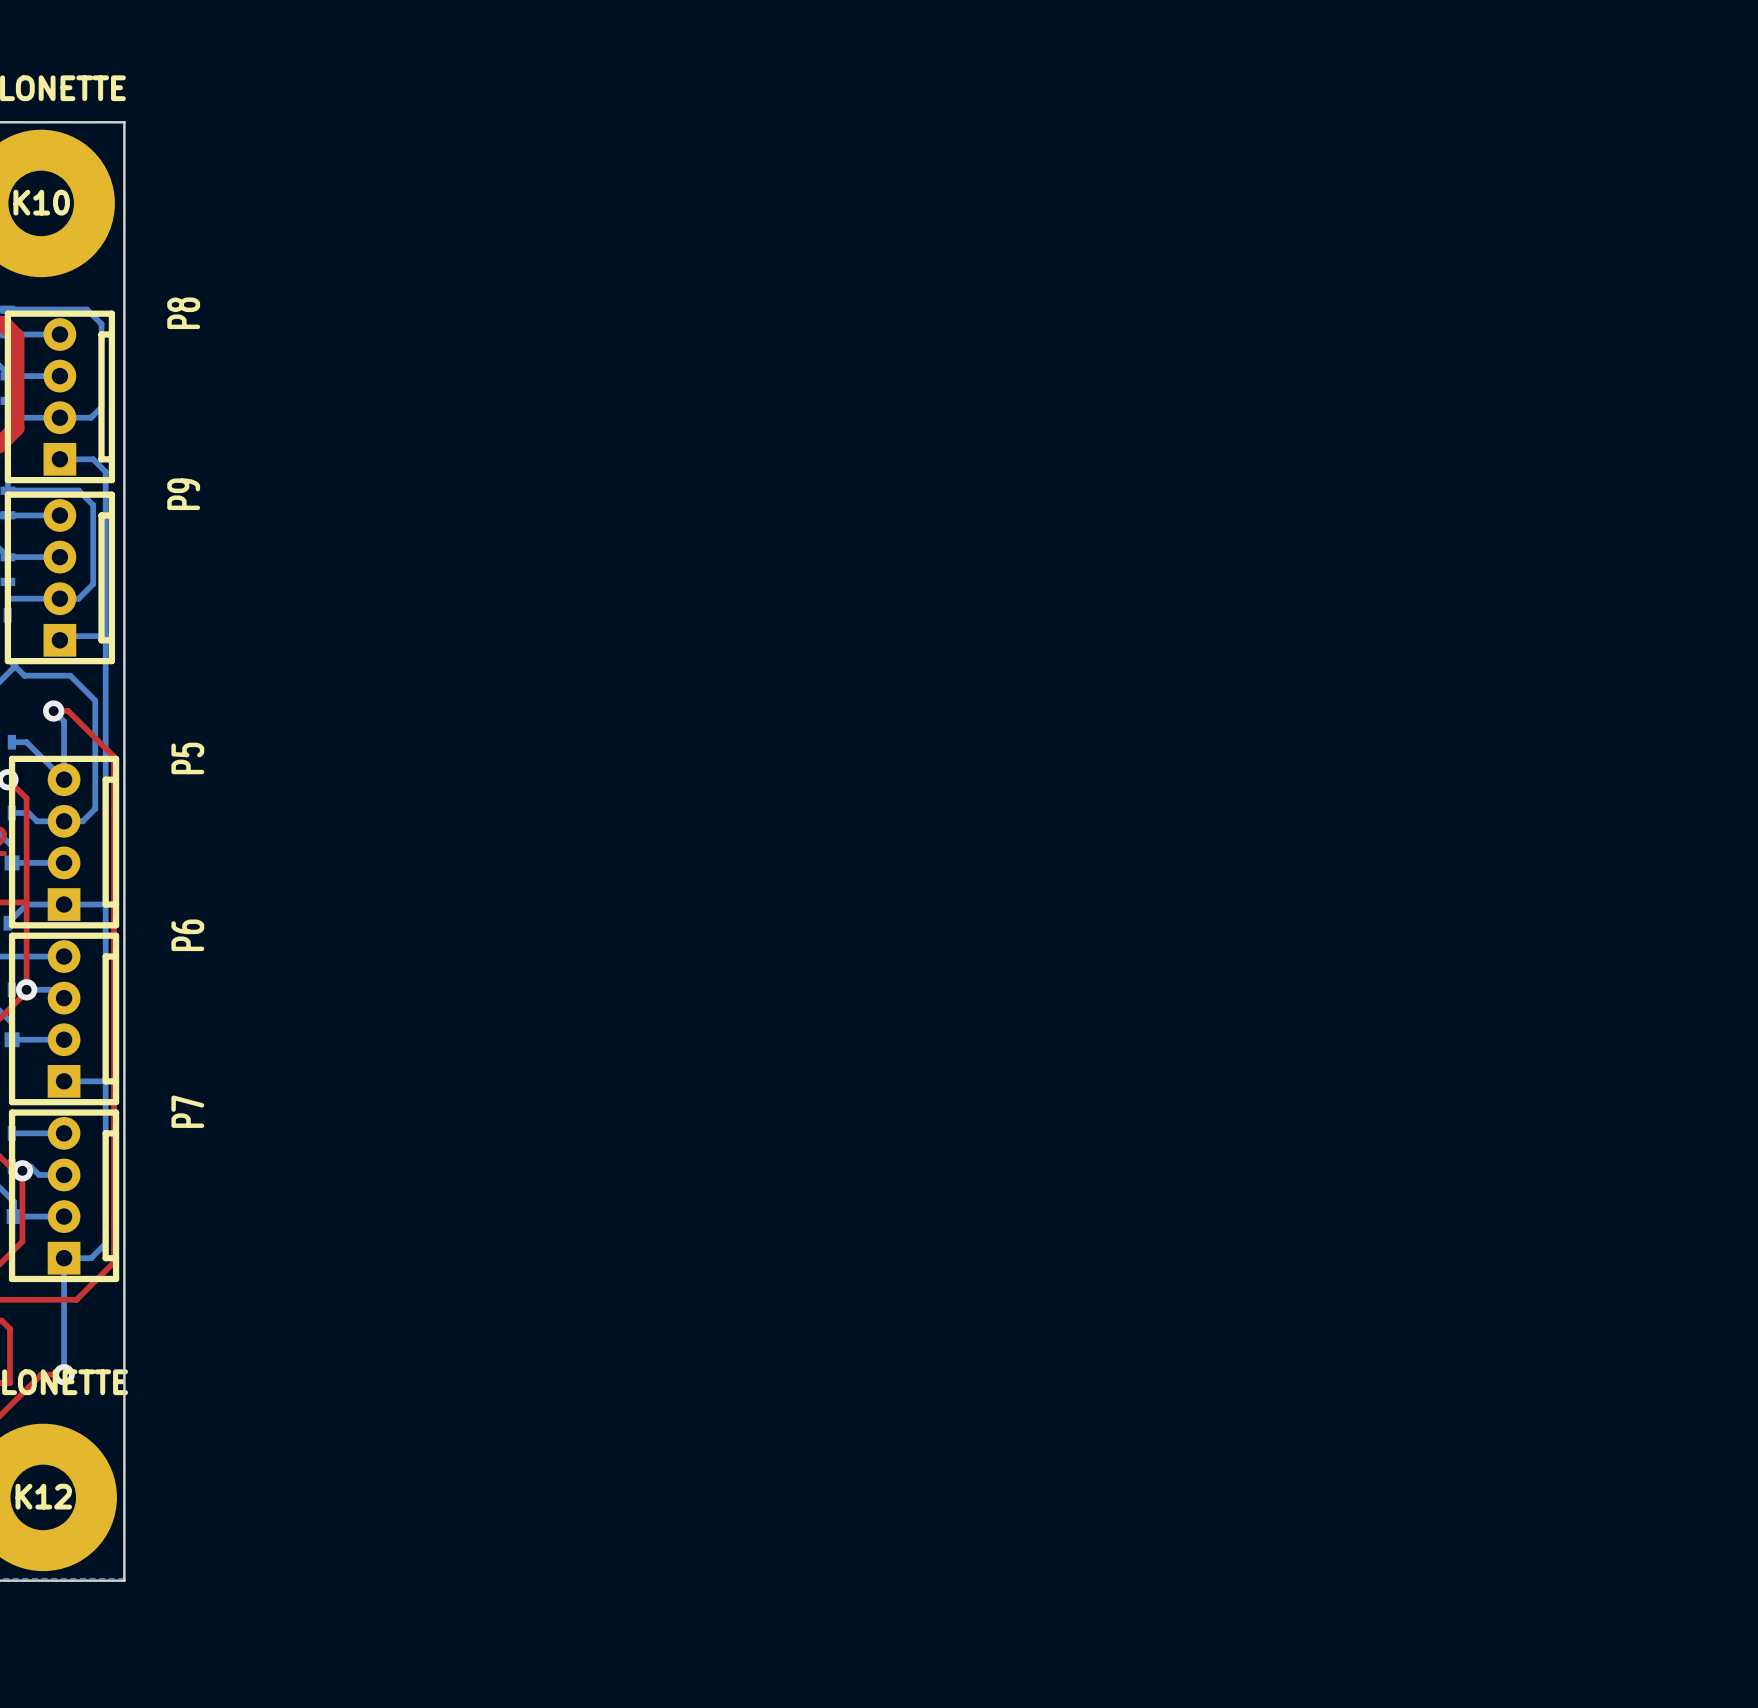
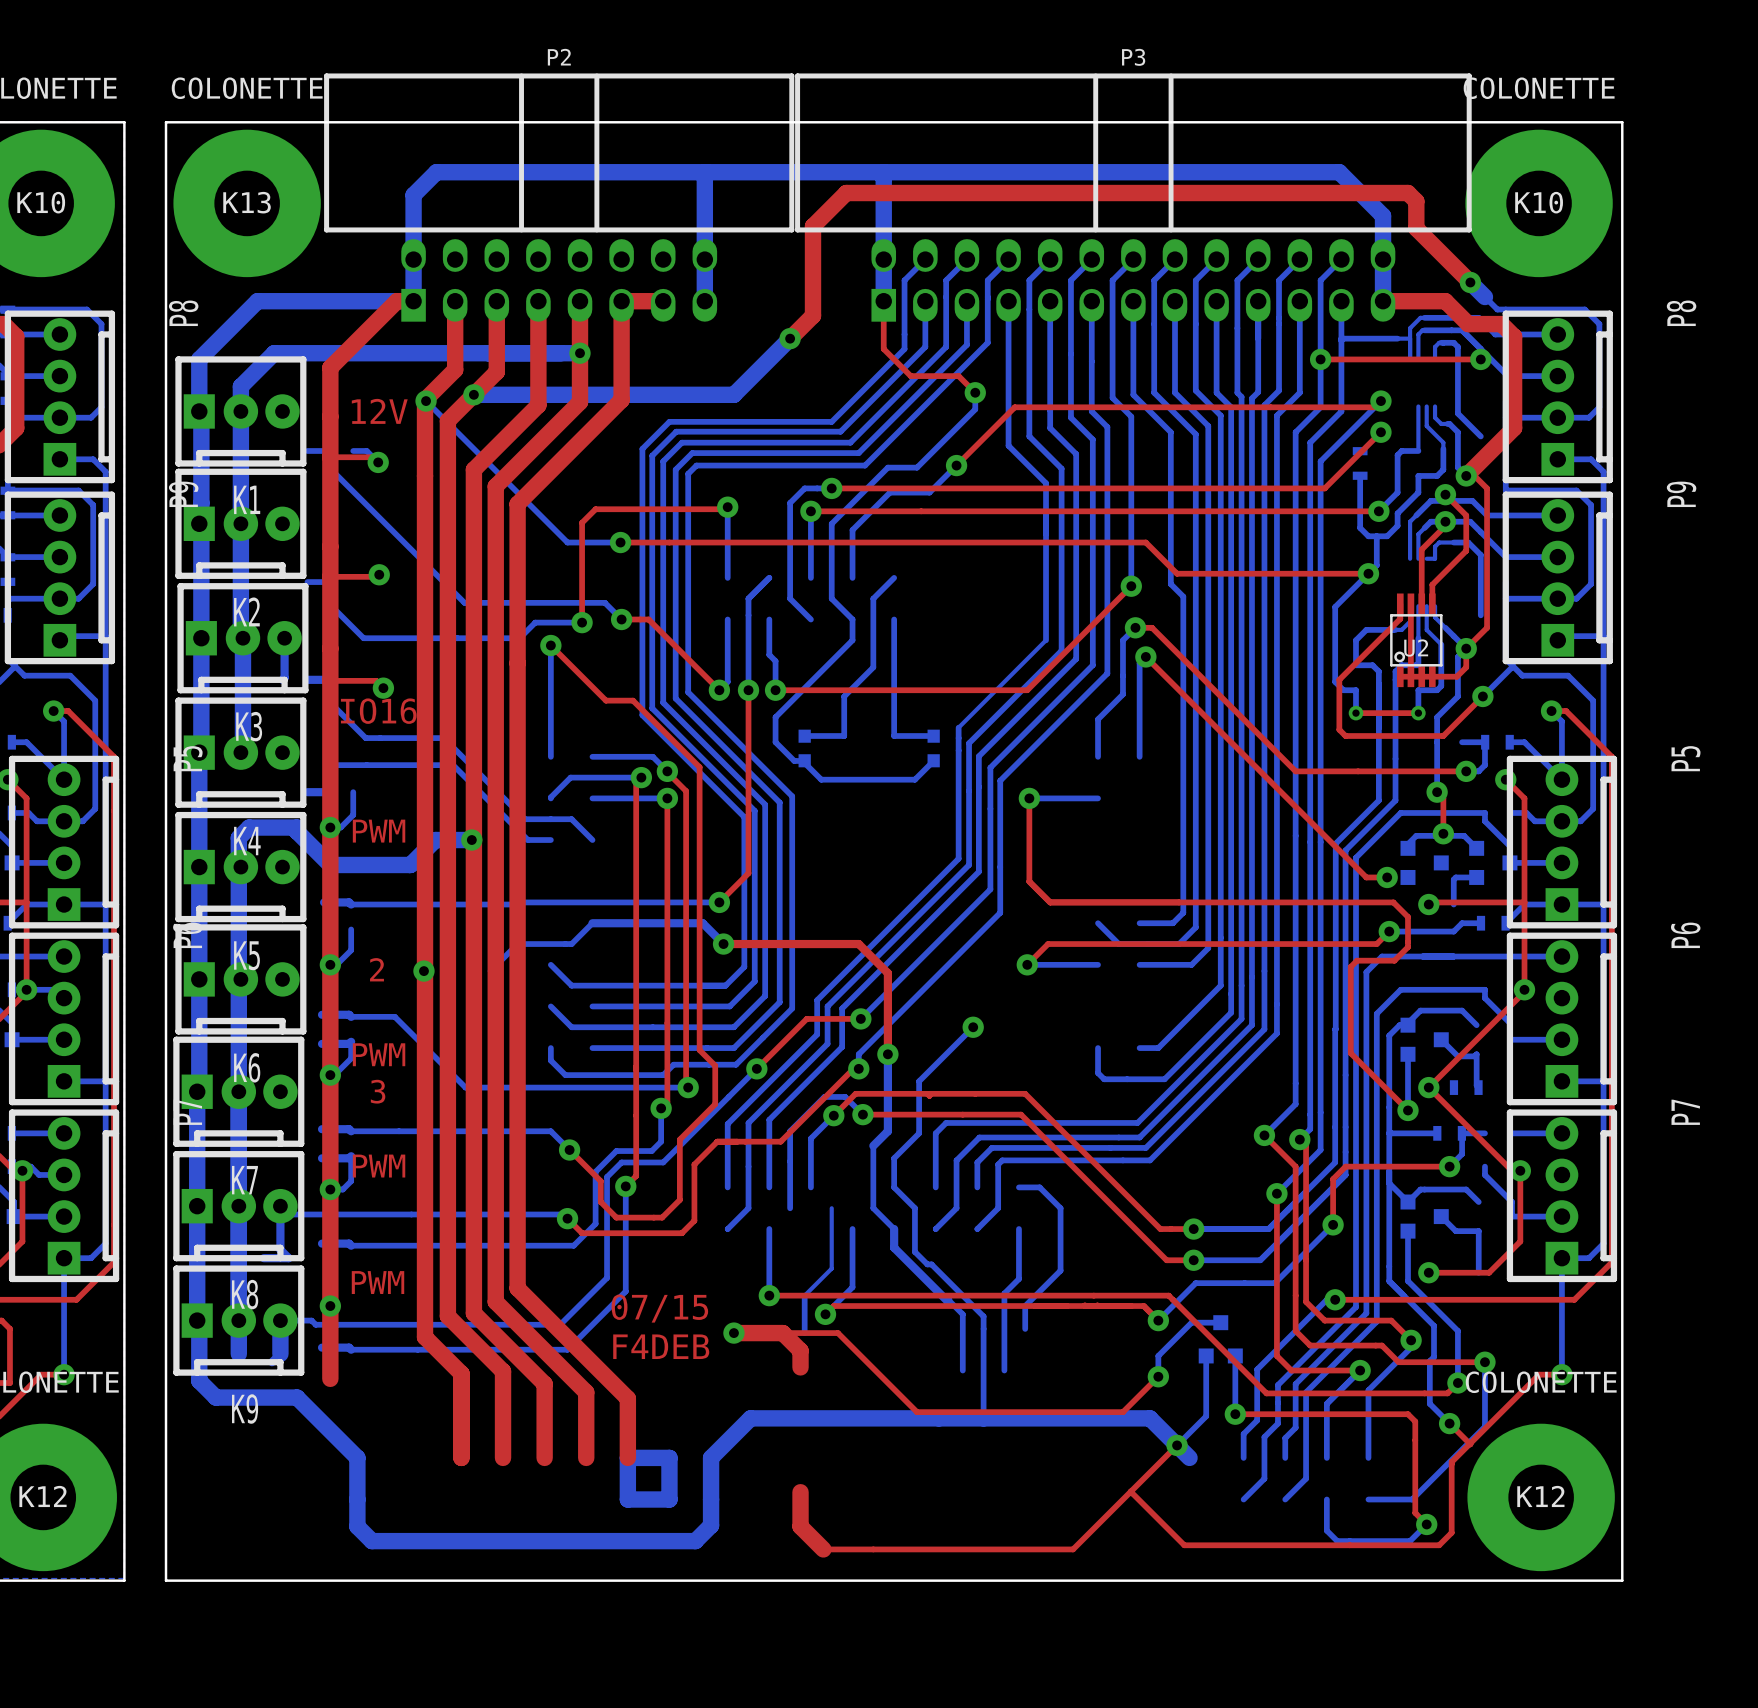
board edge: none -> (166, 122) (166, 1580) (1622, 1580) (1622, 122) (166, 122)
bottom track: none -> (706, 172) (706, 174) (704, 172) (704, 301)
bottom track: none -> (883, 172) (883, 301)
P2: none -> (559, 197)
P3: none -> (1133, 197)
K13: none -> COLONETTE (247, 203)
K10: none -> COLONETTE (1539, 203)
bottom track: none -> (925, 259) (904, 280) (904, 349) (831, 421) (669, 421) (642, 448) (642, 715) (744, 817) (744, 966) (725, 985) (571, 985) (550, 964)
bottom track: none -> (966, 259) (946, 280) (946, 346) (850, 442) (681, 442) (663, 461) (663, 702) (765, 804) (765, 996) (733, 1027) (571, 1027) (550, 1006)
bottom track: none -> (1008, 259) (987, 280) (987, 342) (865, 465) (696, 465) (688, 473) (688, 692) (792, 796) (792, 1008) (736, 1064) (673, 1064) (663, 1075) (565, 1075) (550, 1060) (550, 1048)
bottom track: none -> (1050, 259) (1029, 280) (1029, 436) (1061, 468) (1061, 650) (969, 743) (969, 864) (827, 1006) (827, 1043) (748, 1122) (748, 1208) (727, 1229)
bottom track: none -> (1091, 259) (1070, 280) (1070, 417) (1092, 439) (1092, 665) (990, 767) (990, 889) (860, 1018)
bottom track: none -> (1133, 259) (1112, 280) (1112, 397) (1131, 416) (1131, 586)
bottom track: none -> (1174, 259) (1154, 280) (1154, 392) (1195, 434) (1195, 927) (1179, 944) (1118, 944) (1098, 923)
bottom track: none -> (1216, 259) (1195, 280) (1195, 390) (1220, 415) (1220, 985) (1158, 1048) (1139, 1048)
bottom track: none -> (1258, 259) (1237, 280) (1237, 392) (1241, 396) (1241, 1018) (1137, 1122) (946, 1122) (935, 1133) (935, 1187)
bottom track: none -> (1299, 259) (1279, 280) (1279, 390) (1264, 405) (1264, 1029) (1145, 1147) (991, 1147) (977, 1162) (977, 1187)
bottom track: none -> (1341, 259) (1320, 280) (1320, 407) (1295, 432) (1295, 1104) (1264, 1135)
top track: none -> (1470, 282) (1416, 228) (1416, 201) (1408, 193) (846, 193) (813, 226) (813, 315) (790, 338)
via: none -> (1470, 282)
bottom track: none -> (1484, 297) (1470, 282) (1497, 309) (1584, 309) (1599, 324) (1599, 407) (1588, 417) (1505, 417)
top track: none -> (413, 301) (396, 301) (330, 367) (330, 1378)
top track: none -> (455, 301) (455, 369) (425, 400)
top track: none -> (496, 301) (496, 371) (447, 420) (447, 1316) (503, 1371) (503, 1457)
top track: none -> (538, 301) (538, 405) (473, 469) (473, 1313) (544, 1384) (544, 1457)
top track: none -> (580, 301) (580, 402) (495, 486) (495, 1301) (586, 1392) (586, 1457)
top track: none -> (663, 301) (621, 301) (621, 400) (517, 504) (517, 1288) (627, 1398) (627, 1457)
top track: none -> (883, 301) (883, 349) (910, 376) (958, 376) (975, 392)
bottom track: none -> (925, 301) (925, 346) (840, 431) (676, 431) (652, 455) (652, 708) (754, 810) (754, 981) (729, 1006) (592, 1006)
bottom track: none -> (966, 301) (966, 344) (858, 453) (692, 453) (675, 469) (675, 698) (779, 802) (779, 1002) (733, 1048) (592, 1048)
bottom track: none -> (1008, 301) (1008, 445) (1046, 483) (1046, 640)
bottom track: none -> (1050, 301) (1050, 428) (1076, 454) (1076, 659) (978, 756) (978, 871) (842, 1008) (842, 1047) (769, 1119) (769, 1187)
bottom track: none -> (1091, 301) (1091, 411) (1107, 427) (1107, 673) (1000, 780) (1000, 912) (858, 1054) (858, 1068)
bottom track: none -> (1133, 301) (1133, 394) (1170, 432) (1170, 584) (1183, 596) (1183, 912) (1172, 923) (1139, 923)
bottom track: none -> (1174, 301) (1174, 392) (1208, 426) (1208, 948) (1191, 964) (1139, 964)
bottom track: none -> (1216, 301) (1216, 392) (1231, 407) (1231, 1012) (1164, 1079) (1104, 1079) (1098, 1073) (1098, 1048)
bottom track: none -> (1258, 301) (1258, 392) (1251, 398) (1251, 1025) (1139, 1137) (979, 1137) (956, 1160) (956, 1208) (935, 1229)
bottom track: none -> (1299, 301) (1299, 392) (1276, 415) (1276, 1033) (1150, 1160) (1002, 1160) (998, 1164) (998, 1208) (977, 1229)
bottom track: none -> (1341, 301) (1341, 411) (1310, 442) (1310, 1129) (1299, 1139)
bottom track: none -> (1383, 301) (1383, 215) (1339, 172) (436, 172) (413, 195) (413, 301) (257, 301) (199, 359) (199, 411) (201, 413) (201, 750) (199, 752) (197, 1318) (199, 1320) (199, 1380) (215, 1397) (297, 1397) (357, 1457) (357, 1526) (371, 1541) (695, 1541) (711, 1525) (711, 1457) (750, 1418) (1150, 1418) (1189, 1457) (1177, 1445) (1206, 1416) (1206, 1355)
top track: none -> (1383, 301) (1445, 301) (1468, 324) (1501, 324) (1514, 336) (1514, 428) (1466, 475) (1474, 475) (1487, 488) (1487, 627) (1466, 648) (1466, 667) (1456, 676) (1400, 676)
bottom track: none -> (1557, 334) (1495, 334) (1478, 317) (1420, 317) (1410, 328) (1410, 359)
bottom track: none -> (790, 338) (733, 394) (473, 394)
via: none -> (790, 338)
bottom track: none -> (1341, 338) (1410, 338)
bottom track: none -> (580, 353) (274, 353) (240, 386) (240, 636) (242, 638) (242, 750) (240, 752)
via: none -> (580, 353)
top track: none -> (1320, 359) (1480, 359)
via: none -> (1320, 359)
bottom track: none -> (1418, 359) (1418, 334) (1422, 330) (1462, 330) (1505, 376) (1557, 376)
bottom track: none -> (1426, 359) (1435, 359) (1435, 346) (1439, 342) (1453, 342) (1457, 346) (1457, 413) (1480, 436)
via: none -> (1480, 359)
bottom track: none -> (975, 392) (975, 409) (917, 467) (887, 467) (831, 523) (831, 598) (852, 619) (852, 640) (775, 717) (775, 742) (794, 760) (804, 760) (821, 779) (914, 779) (933, 760)
via: none -> (975, 392)
via: none -> (473, 394)
P8: none -> (1557, 396)
top track: none -> (425, 400) (425, 1337) (461, 1373) (461, 1457)
bottom track: none -> (426, 401) (567, 542) (620, 542)
via: none -> (426, 401)
bottom track: none -> (1380, 401) (1320, 461) (1320, 1150) (1276, 1193)
top track: none -> (1380, 401) (1374, 407) (1014, 407) (956, 465)
via: none -> (1380, 401)
bottom track: none -> (1505, 401) (1505, 490) (1576, 490) (1591, 505) (1591, 584) (1576, 598) (1505, 598)
bottom track: none -> (1418, 406) (1418, 450) (1401, 450) (1397, 455) (1397, 492) (1378, 511)
bottom track: none -> (1426, 406) (1426, 426) (1443, 442) (1443, 469) (1437, 475) (1418, 475) (1418, 492) (1397, 513) (1397, 525) (1387, 536) (1368, 536) (1360, 527) (1360, 475)
bottom track: none -> (1435, 406) (1435, 417) (1441, 423) (1449, 423) (1457, 432) (1457, 467) (1466, 475)
K1: none -> (240, 411)
text: none -> 12V (379, 411)
top track: none -> (1380, 432) (1324, 488) (831, 488)
via: none -> (1380, 432)
bottom track: none -> (307, 450) (328, 450) (328, 466) (464, 602) (604, 602) (621, 619)
bottom track: none -> (353, 450) (366, 450) (378, 462)
top track: none -> (330, 457) (373, 457) (378, 462)
bottom track: none -> (1557, 459) (1591, 459) (1603, 471) (1603, 1243) (1588, 1258) (1561, 1258) (1561, 1374)
via: none -> (378, 462)
part: none -> (1360, 463)
bottom track: none -> (956, 465) (929, 492) (889, 492) (852, 530) (852, 577)
via: none -> (956, 465)
via: none -> (1466, 475)
bottom track: none -> (831, 488) (804, 488) (790, 503) (790, 598) (810, 619)
via: none -> (831, 488)
top track: none -> (1445, 494) (1466, 515) (1466, 550) (1432, 584) (1432, 603)
via: none -> (1445, 494)
bottom track: none -> (727, 507) (727, 577)
top track: none -> (727, 507) (725, 509) (595, 509) (582, 522) (582, 622)
via: none -> (727, 507)
bottom track: none -> (810, 511) (810, 577)
top track: none -> (810, 511) (1378, 511)
via: none -> (810, 511)
via: none -> (1378, 511)
bottom track: none -> (1557, 515) (1487, 515) (1472, 500) (1430, 500) (1410, 521) (1410, 558)
top track: none -> (1443, 521) (1445, 521) (1445, 525) (1421, 549) (1421, 603)
via: none -> (1445, 521)
K2: none -> (240, 523)
bottom track: none -> (1376, 536) (1376, 565) (1335, 607) (1335, 681) (1343, 690) (1355, 690) (1355, 713)
top track: none -> (620, 542) (1145, 542) (1177, 573) (1368, 573)
via: none -> (620, 542)
bottom track: none -> (1557, 557) (1505, 557) (1470, 521) (1430, 521) (1418, 534) (1418, 558)
bottom track: none -> (1426, 558) (1435, 558) (1435, 546) (1439, 542) (1468, 542) (1480, 555) (1480, 615)
via: none -> (1368, 573)
top track: none -> (379, 574) (377, 576) (330, 576)
via: none -> (379, 574)
bottom track: none -> (769, 577) (748, 598) (748, 690)
bottom track: none -> (894, 577) (873, 598) (873, 667) (844, 696) (844, 736) (804, 736)
P9: none -> (1557, 577)
bottom track: none -> (307, 582) (328, 582) (328, 602) (363, 638) (519, 638) (535, 622) (582, 622)
bottom track: none -> (1505, 582) (1505, 659) (1522, 675) (1568, 675) (1593, 700) (1593, 808) (1580, 821) (1534, 821) (1526, 812) (1509, 812) (1509, 783) (1505, 779)
top track: none -> (1131, 586) (1027, 690) (775, 690)
via: none -> (1131, 586)
top track: none -> (1400, 603) (1400, 618) (1339, 679) (1339, 729) (1345, 736) (1443, 736) (1482, 696)
top track: none -> (1410, 603) (1410, 676)
bottom track: none -> (1410, 606) (1410, 621) (1401, 629) (1366, 629) (1355, 640) (1355, 665) (1372, 665) (1378, 671) (1378, 800) (1335, 843) (1335, 1162) (1268, 1229) (1193, 1229)
bottom track: none -> (1418, 606) (1418, 665) (1401, 665) (1395, 671) (1395, 800) (1345, 850) (1345, 1174) (1260, 1260) (1193, 1260)
bottom track: none -> (1426, 606) (1426, 629) (1441, 644) (1441, 686) (1437, 690) (1418, 690) (1418, 713)
bottom track: none -> (1435, 606) (1435, 617) (1466, 648) (1457, 656) (1457, 696) (1437, 717) (1437, 792)
top track: none -> (621, 619) (648, 619) (719, 690)
via: none -> (621, 619)
bottom track: none -> (727, 619) (727, 681) (719, 690)
bottom track: none -> (769, 619) (769, 654) (775, 661) (775, 690)
bottom track: none -> (894, 619) (894, 736) (933, 736)
via: none -> (582, 622)
bottom track: none -> (1135, 627) (1122, 640) (1122, 694) (1098, 719) (1098, 756)
top track: none -> (1135, 627) (1152, 627) (1295, 771) (1466, 771)
via: none -> (1135, 627)
bottom track: none -> (1553, 636) (1603, 636)
K3: none -> (242, 638)
bottom track: none -> (284, 638) (284, 677) (282, 679)
bottom track: none -> (1046, 640) (958, 727) (958, 858) (817, 1000) (817, 1034) (727, 1123) (727, 1187)
U2: none -> (1416, 640)
bottom track: none -> (550, 645) (550, 756)
top track: none -> (550, 645) (606, 700) (633, 700) (699, 767) (699, 1050) (715, 1065) (715, 1104) (679, 1139) (679, 1199) (662, 1217) (616, 1217) (600, 1202) (600, 1181) (569, 1150)
via: none -> (550, 645)
via: none -> (1466, 648)
bottom track: none -> (1145, 656) (1139, 663) (1139, 756)
top track: none -> (1145, 656) (1366, 877) (1387, 877)
via: none -> (1145, 656)
bottom track: none -> (1513, 666) (1482, 696)
bottom track: none -> (307, 679) (328, 679) (328, 700) (365, 738) (443, 738) (524, 819) (571, 819) (592, 840)
top track: none -> (330, 680) (376, 680) (383, 688)
via: none -> (383, 688)
via: none -> (719, 690)
top track: none -> (748, 690) (748, 873) (719, 902)
via: none -> (748, 690)
via: none -> (775, 690)
via: none -> (1482, 696)
text: none -> IO16 (378, 711)
bottom track: none -> (1551, 711) (1561, 721) (1561, 779) (1524, 742) (1509, 742)
top track: none -> (1551, 711) (1566, 711) (1611, 756) (1611, 1262) (1574, 1299) (1335, 1299)
via: none -> (1551, 711)
top track: none -> (1355, 713) (1418, 713)
via: none -> (1355, 713)
via: none -> (1418, 713)
bottom track: none -> (1462, 742) (1484, 742) (1484, 765) (1478, 771) (1466, 771)
part: none -> (1497, 742)
part: none -> (804, 748)
part: none -> (933, 748)
K4: none -> (240, 752)
bottom track: none -> (592, 756) (652, 756) (667, 771)
top track: none -> (667, 771) (686, 791) (686, 1085) (688, 1087)
via: none -> (667, 771)
via: none -> (1466, 771)
bottom track: none -> (641, 777) (570, 777) (550, 798)
top track: none -> (641, 777) (636, 782) (636, 1176) (625, 1186)
via: none -> (641, 777)
top track: none -> (1505, 779) (1524, 798) (1524, 991) (1428, 1087) (1512, 1170) (1520, 1170) (1520, 1241) (1489, 1272) (1428, 1272)
via: none -> (1505, 779)
bottom track: none -> (307, 792) (328, 792) (328, 771) (334, 765) (453, 765) (527, 840) (550, 840)
bottom track: none -> (353, 792) (353, 815) (340, 827) (330, 827)
top track: none -> (1437, 792) (1443, 798) (1443, 833)
via: none -> (1437, 792)
bottom track: none -> (592, 798) (667, 798)
top track: none -> (667, 798) (667, 1102) (661, 1108)
via: none -> (667, 798)
bottom track: none -> (1029, 798) (1098, 798)
top track: none -> (1029, 798) (1029, 881) (1050, 902) (1393, 902) (1408, 917) (1408, 947) (1394, 960) (1357, 960) (1350, 966) (1350, 1053) (1408, 1110)
via: none -> (1029, 798)
via: none -> (330, 827)
text: none -> PWM (379, 831)
via: none -> (1443, 833)
bottom track: none -> (471, 840) (435, 840) (410, 864) (330, 864) (297, 831) (297, 827) (249, 827) (238, 837) (238, 1353)
via: none -> (471, 840)
P5: none -> (1561, 842)
bottom track: none -> (1408, 848) (1408, 844) (1416, 835) (1464, 835) (1476, 848)
part: none -> (1424, 862)
part: none -> (1493, 862)
bottom track: none -> (1561, 862) (1509, 862) (1509, 846) (1484, 821) (1484, 812) (1400, 812) (1355, 857) (1355, 1307) (1277, 1385) (1277, 1423) (1264, 1437) (1264, 1478) (1243, 1499)
K5: none -> (240, 867)
via: none -> (1387, 877)
bottom track: none -> (1476, 877) (1455, 877) (1453, 879) (1453, 904)
bottom track: none -> (324, 902) (349, 902) (351, 904) (719, 902)
via: none -> (719, 902)
top track: none -> (1524, 902) (1430, 902) (1428, 904)
via: none -> (1428, 904)
bottom track: none -> (1603, 904) (1524, 904) (1505, 923)
bottom track: none -> (702, 923) (723, 944) (702, 923)
bottom track: none -> (702, 923) (592, 923) (571, 944) (517, 944) (490, 971)
bottom track: none -> (1480, 923) (1462, 923) (1453, 931) (1389, 931)
part: none -> (1493, 923)
bottom track: none -> (351, 929) (351, 950) (336, 964) (330, 964)
top track: none -> (1389, 931) (1376, 944) (1048, 944) (1027, 964)
via: none -> (1389, 931)
top track: none -> (723, 944) (858, 944) (887, 973) (887, 1054)
via: none -> (723, 944)
bottom track: none -> (1561, 956) (1381, 956) (1366, 972) (1366, 1313) (1295, 1384) (1295, 1427) (1285, 1438) (1285, 1457)
via: none -> (330, 964)
bottom track: none -> (1027, 964) (1098, 964)
via: none -> (1027, 964)
text: none -> 2 (376, 969)
via: none -> (423, 971)
K6: none -> (240, 979)
via: none -> (1524, 989)
bottom track: none -> (322, 1014) (394, 1016) (465, 1087) (688, 1087)
top track: none -> (860, 1018) (806, 1018) (756, 1068)
via: none -> (860, 1018)
P6: none -> (1561, 1018)
bottom track: none -> (1476, 1025) (1462, 1010) (1420, 1010) (1408, 1025) (1399, 1025) (1389, 1035) (1389, 1281) (1434, 1325) (1434, 1357) (1429, 1361) (1429, 1403) (1449, 1423)
bottom track: none -> (973, 1027) (919, 1081) (919, 1133) (894, 1158) (894, 1187) (914, 1208) (914, 1251) (927, 1264) (931, 1264) (983, 1316) (983, 1418)
via: none -> (973, 1027)
part: none -> (1424, 1039)
bottom track: none -> (1441, 1039) (1457, 1056) (1474, 1056) (1476, 1054) (1476, 1085) (1478, 1087)
bottom track: none -> (1561, 1039) (1509, 1039) (1509, 1023) (1484, 998) (1484, 989) (1400, 989) (1376, 1013) (1376, 1321) (1306, 1392) (1306, 1478) (1285, 1499)
bottom track: none -> (322, 1043) (349, 1043) (351, 1041) (351, 1058) (334, 1075) (330, 1075)
text: none -> PWM (379, 1054)
bottom track: none -> (887, 1054) (887, 1131) (873, 1145) (873, 1208) (894, 1229) (894, 1247) (962, 1314) (962, 1370)
via: none -> (887, 1054)
bottom track: none -> (1408, 1054) (1408, 1110)
bottom track: none -> (756, 1068) (663, 1162) (621, 1162) (607, 1177) (607, 1277) (560, 1324) (315, 1324) (311, 1320) (280, 1320) (280, 1353) (272, 1362)
via: none -> (756, 1068)
top track: none -> (858, 1068) (853, 1068) (780, 1141) (717, 1141) (694, 1164) (694, 1220) (681, 1233) (582, 1233) (567, 1218)
via: none -> (858, 1068)
via: none -> (330, 1075)
bottom track: none -> (1561, 1081) (1603, 1081)
via: none -> (688, 1087)
via: none -> (1428, 1087)
part: none -> (1466, 1087)
K7: none -> (238, 1091)
text: none -> 3 (378, 1091)
bottom track: none -> (661, 1108) (661, 1141) (651, 1151) (616, 1151) (595, 1171) (595, 1223) (573, 1245) (351, 1245) (349, 1243) (322, 1243)
via: none -> (661, 1108)
via: none -> (1408, 1110)
bottom track: none -> (862, 1114) (845, 1096) (824, 1096) (790, 1131) (790, 1208)
top track: none -> (862, 1114) (1021, 1114) (1166, 1260) (1193, 1260)
via: none -> (862, 1114)
bottom track: none -> (833, 1115) (810, 1138) (810, 1187)
top track: none -> (833, 1115) (855, 1093) (927, 1093) (929, 1095) (929, 1093) (1025, 1093) (1160, 1229) (1193, 1229)
via: none -> (833, 1115)
bottom track: none -> (322, 1129) (349, 1129) (351, 1131) (550, 1131) (569, 1150)
bottom track: none -> (1389, 1133) (1437, 1133)
part: none -> (1449, 1133)
bottom track: none -> (1484, 1133) (1462, 1133) (1462, 1154) (1449, 1166)
bottom track: none -> (1509, 1133) (1561, 1133)
top track: none -> (1264, 1135) (1295, 1166) (1295, 1330) (1310, 1345) (1381, 1345) (1398, 1362) (1484, 1362)
via: none -> (1264, 1135)
top track: none -> (1299, 1139) (1306, 1145) (1306, 1301) (1324, 1320) (1391, 1320) (1411, 1340)
via: none -> (1299, 1139)
via: none -> (569, 1150)
bottom track: none -> (322, 1158) (349, 1158) (351, 1156) (351, 1181) (342, 1189) (330, 1189)
text: none -> PWM (379, 1166)
top track: none -> (1449, 1166) (1345, 1166) (1333, 1179) (1333, 1224)
via: none -> (1449, 1166)
bottom track: none -> (1484, 1166) (1484, 1174) (1512, 1202) (1512, 1216) (1561, 1216)
via: none -> (1520, 1170)
bottom track: none -> (1389, 1183) (1408, 1202) (1420, 1189) (1466, 1189) (1478, 1202)
bottom track: none -> (625, 1186) (625, 1291) (567, 1349) (351, 1349) (349, 1347) (322, 1347)
via: none -> (625, 1186)
bottom track: none -> (1018, 1187) (1039, 1187) (1060, 1208) (1060, 1270) (1025, 1306) (1025, 1328)
via: none -> (330, 1189)
top track: none -> (1276, 1193) (1276, 1355) (1291, 1370) (1360, 1370)
via: none -> (1276, 1193)
P7: none -> (1561, 1195)
K8: none -> (238, 1206)
bottom track: none -> (831, 1208) (831, 1268) (804, 1295) (804, 1333)
part: none -> (1424, 1216)
bottom track: none -> (1441, 1216) (1455, 1231) (1478, 1231) (1478, 1272)
bottom track: none -> (567, 1218) (563, 1214) (288, 1214) (280, 1206) (280, 1249) (288, 1258) (263, 1258)
via: none -> (567, 1218)
bottom track: none -> (1333, 1224) (1274, 1283) (1195, 1283) (1158, 1320)
via: none -> (1333, 1224)
bottom track: none -> (769, 1229) (769, 1295)
bottom track: none -> (852, 1229) (852, 1287) (825, 1314)
bottom track: none -> (1018, 1229) (1018, 1278) (1004, 1293) (1004, 1370)
via: none -> (1193, 1229)
bottom track: none -> (1408, 1231) (1408, 1281) (1457, 1330) (1457, 1383)
via: none -> (1193, 1260)
via: none -> (1428, 1272)
text: none -> PWM (378, 1282)
top track: none -> (769, 1295) (1168, 1295) (1266, 1393) (1447, 1393) (1457, 1383)
via: none -> (769, 1295)
bottom track: none -> (1335, 1299) (1326, 1299) (1257, 1369) (1257, 1420) (1243, 1433) (1243, 1457)
via: none -> (1335, 1299)
via: none -> (330, 1306)
text: none -> 07/15 (659, 1308)
top track: none -> (825, 1314) (833, 1306) (1143, 1306) (1158, 1320)
via: none -> (825, 1314)
K9: none -> (238, 1320)
via: none -> (1158, 1320)
bottom track: none -> (1220, 1322) (1191, 1322) (1158, 1355) (1158, 1376)
via: none -> (733, 1333)
part: none -> (1220, 1339)
bottom track: none -> (1411, 1340) (1411, 1347) (1368, 1390) (1368, 1457)
via: none -> (1411, 1340)
text: none -> F4DEB (661, 1346)
bottom track: none -> (1235, 1355) (1235, 1414)
bottom track: none -> (1484, 1362) (1484, 1426) (1412, 1499) (1368, 1499)
via: none -> (1484, 1362)
top track: none -> (800, 1367) (800, 1350) (782, 1333) (733, 1333) (837, 1333) (917, 1412) (1122, 1412) (1158, 1376)
bottom track: none -> (1360, 1370) (1326, 1403) (1326, 1457)
via: none -> (1360, 1370)
top track: none -> (1561, 1374) (1539, 1374) (1451, 1462) (1451, 1532) (1439, 1545) (1184, 1545) (1131, 1491)
via: none -> (1561, 1374)
via: none -> (1158, 1376)
via: none -> (1457, 1383)
top track: none -> (1235, 1414) (1408, 1414) (1415, 1421) (1415, 1513) (1426, 1524)
via: none -> (1235, 1414)
top track: none -> (1449, 1423) (1470, 1443)
via: none -> (1449, 1423)
top track: none -> (1177, 1445) (1073, 1549) (823, 1549) (800, 1526) (800, 1492)
via: none -> (1177, 1445)
bottom track: none -> (627, 1457) (669, 1457) (669, 1499) (627, 1499) (627, 1457)
K12: none -> COLONETTE (1541, 1497)
bottom track: none -> (1326, 1499) (1326, 1530) (1337, 1541) (1410, 1541) (1426, 1524)
via: none -> (1426, 1524)

